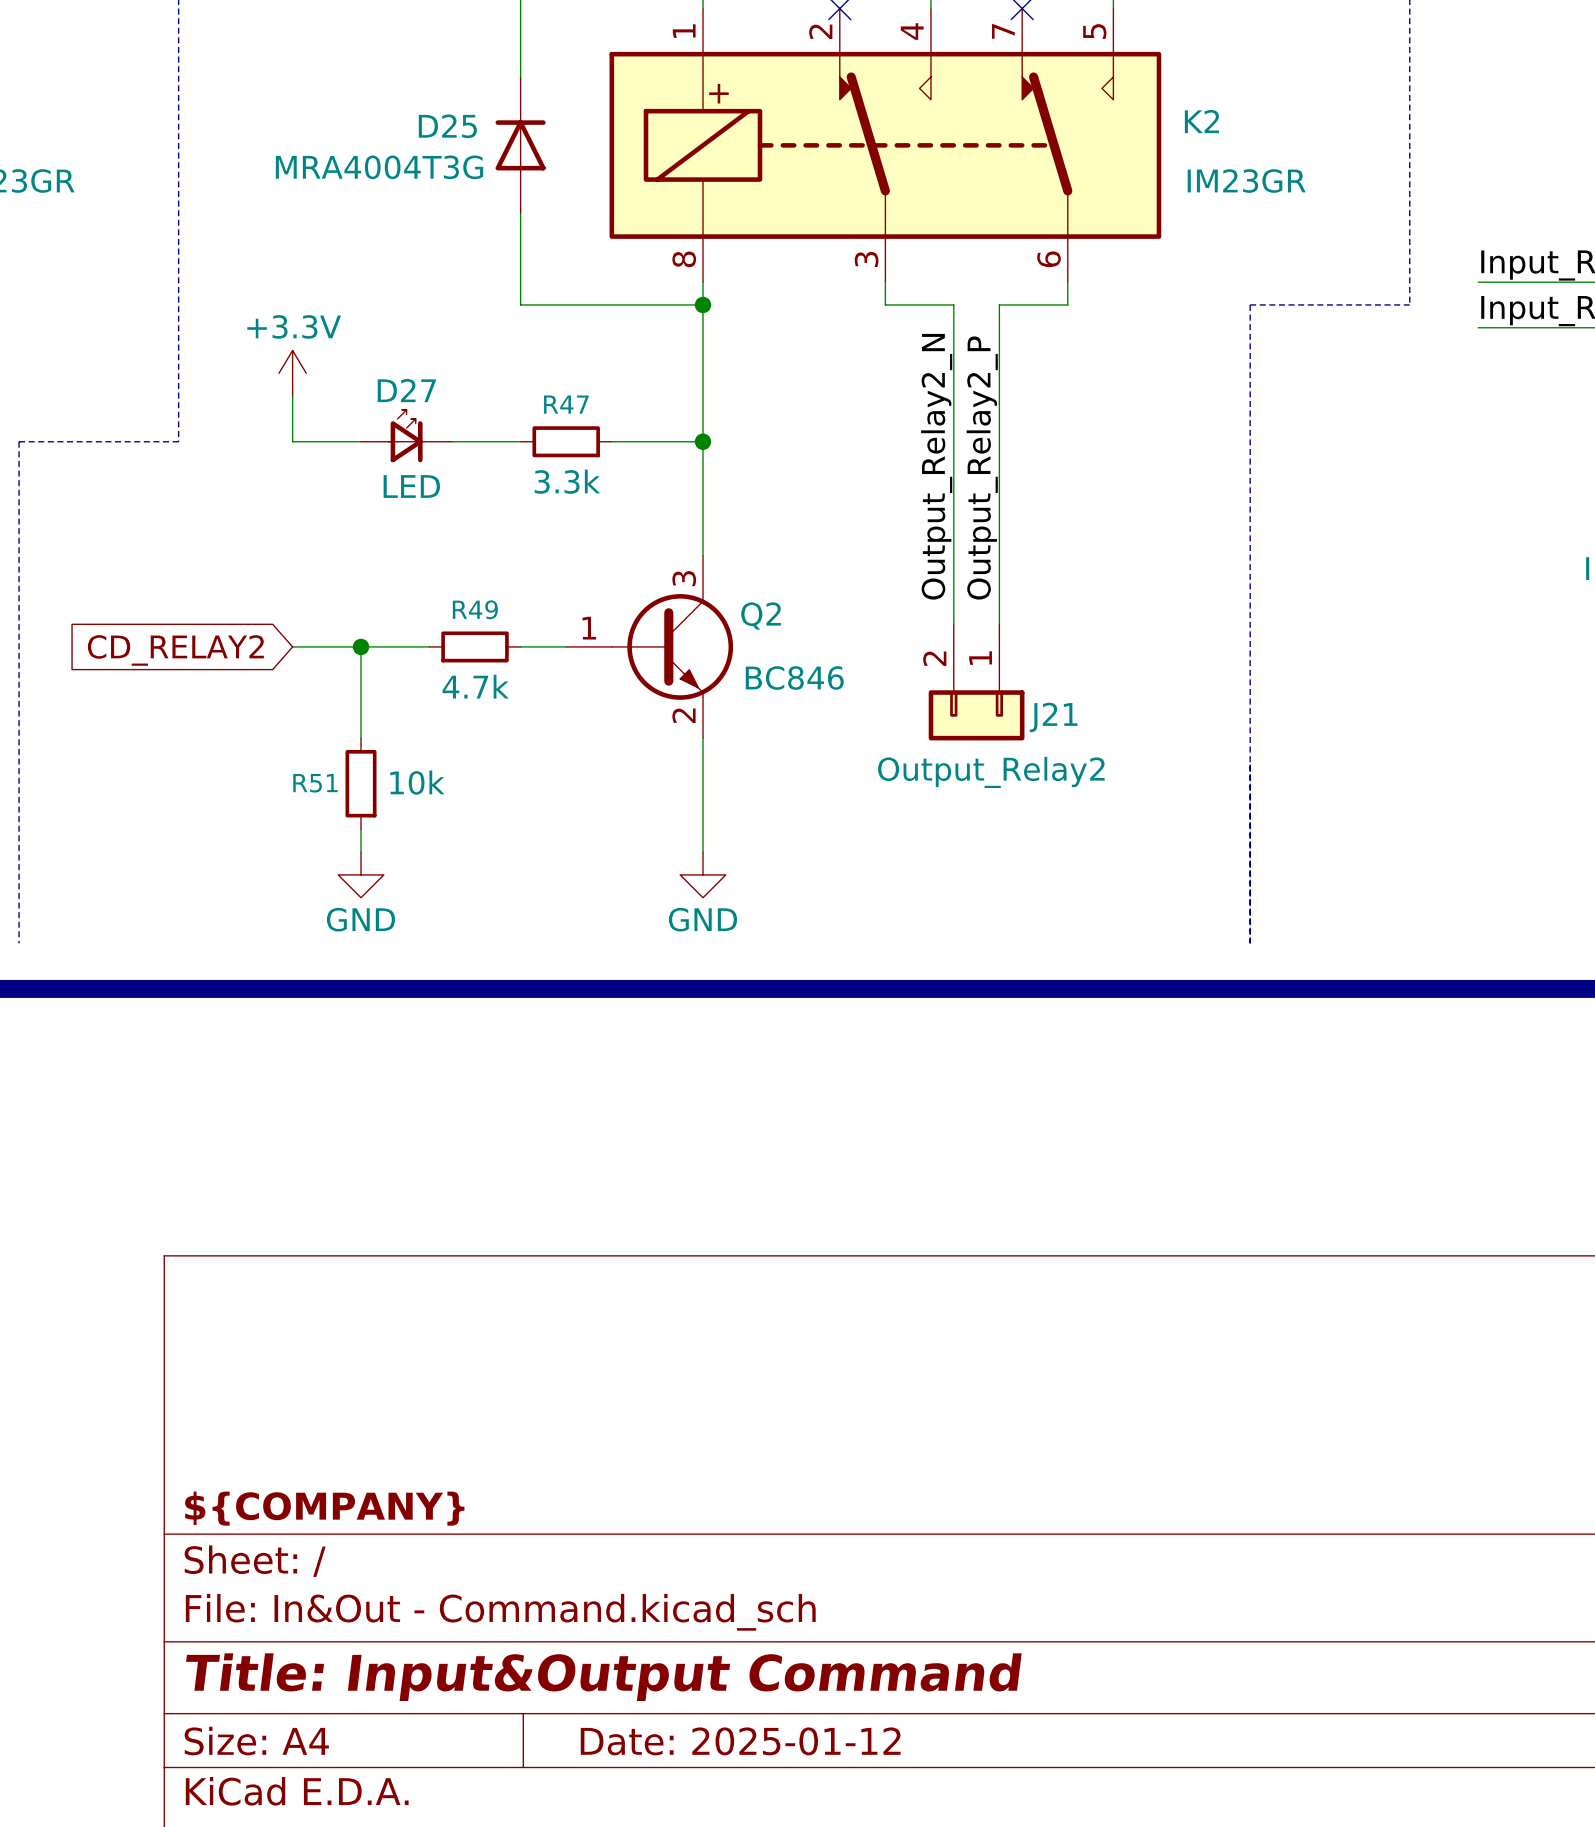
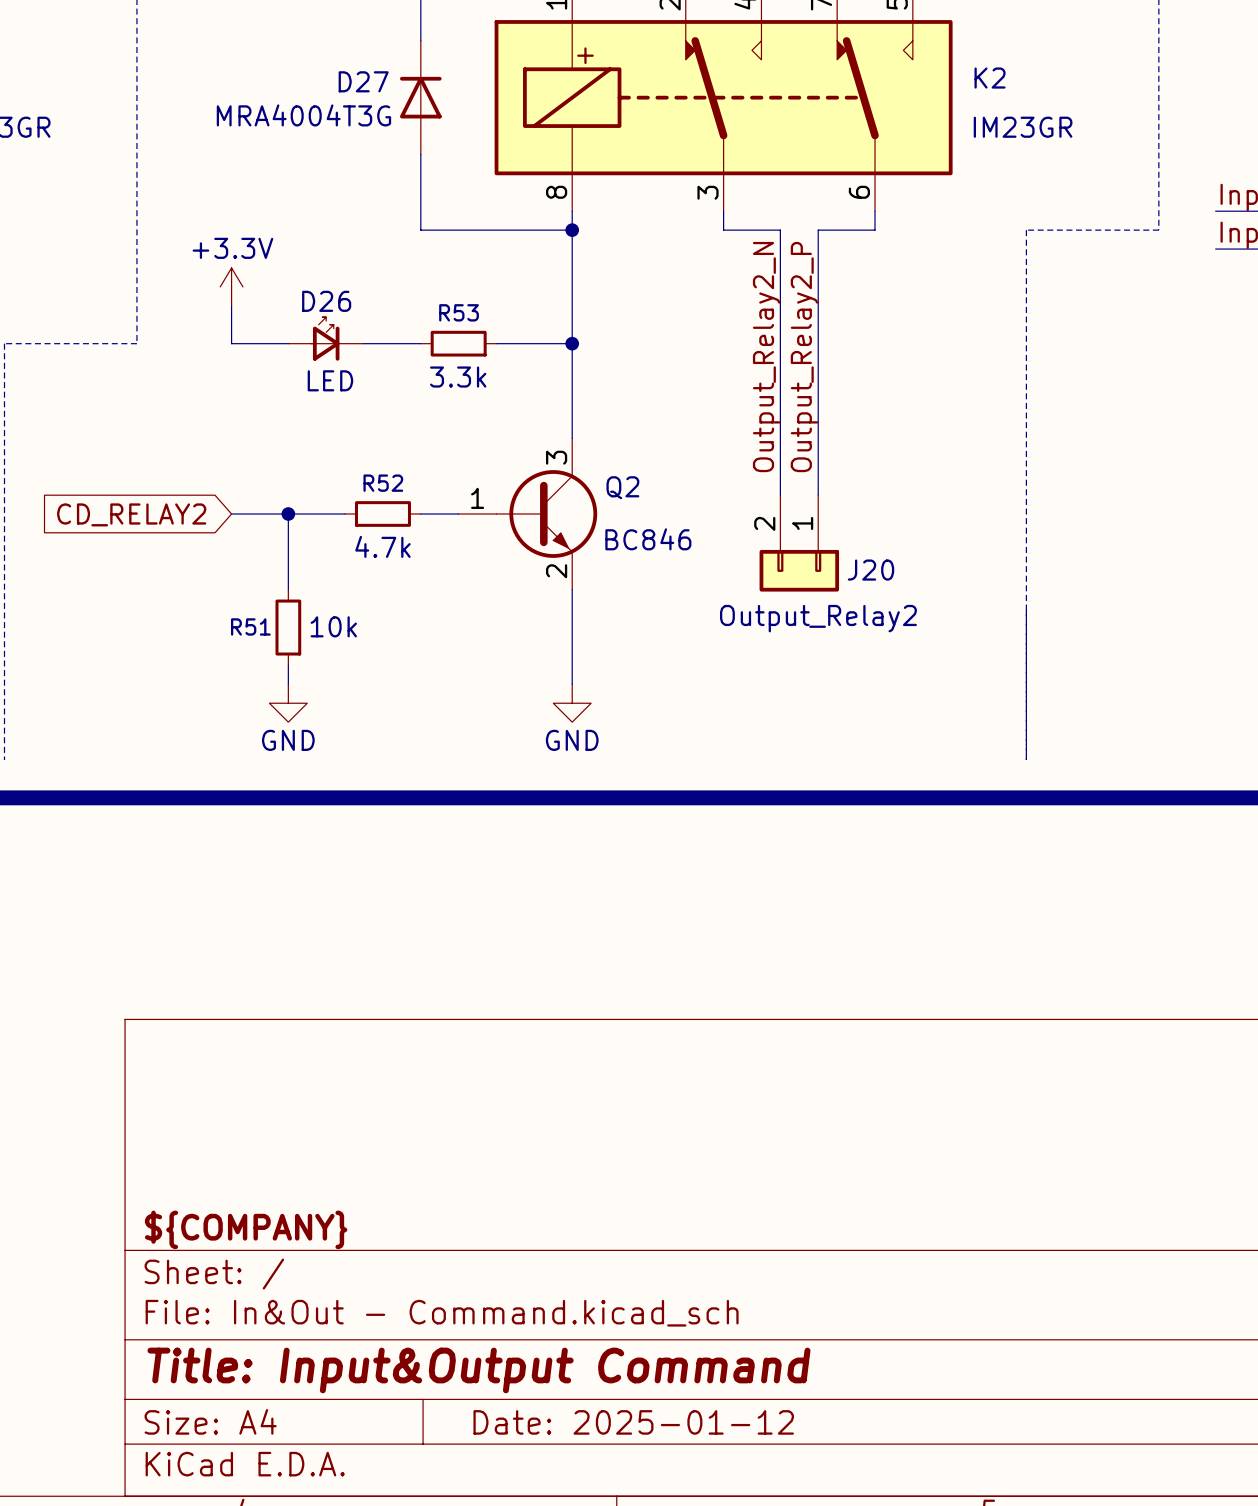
D25 name: D25 (447, 126) -> D27 (363, 81)
D27 name: D27 (406, 390) -> D26 (326, 301)
R47 name: R47 (566, 404) -> R53 (459, 312)
R49 name: R49 (475, 609) -> R52 (383, 483)
J21 name: J21 (1053, 717) -> J20 (870, 570)

